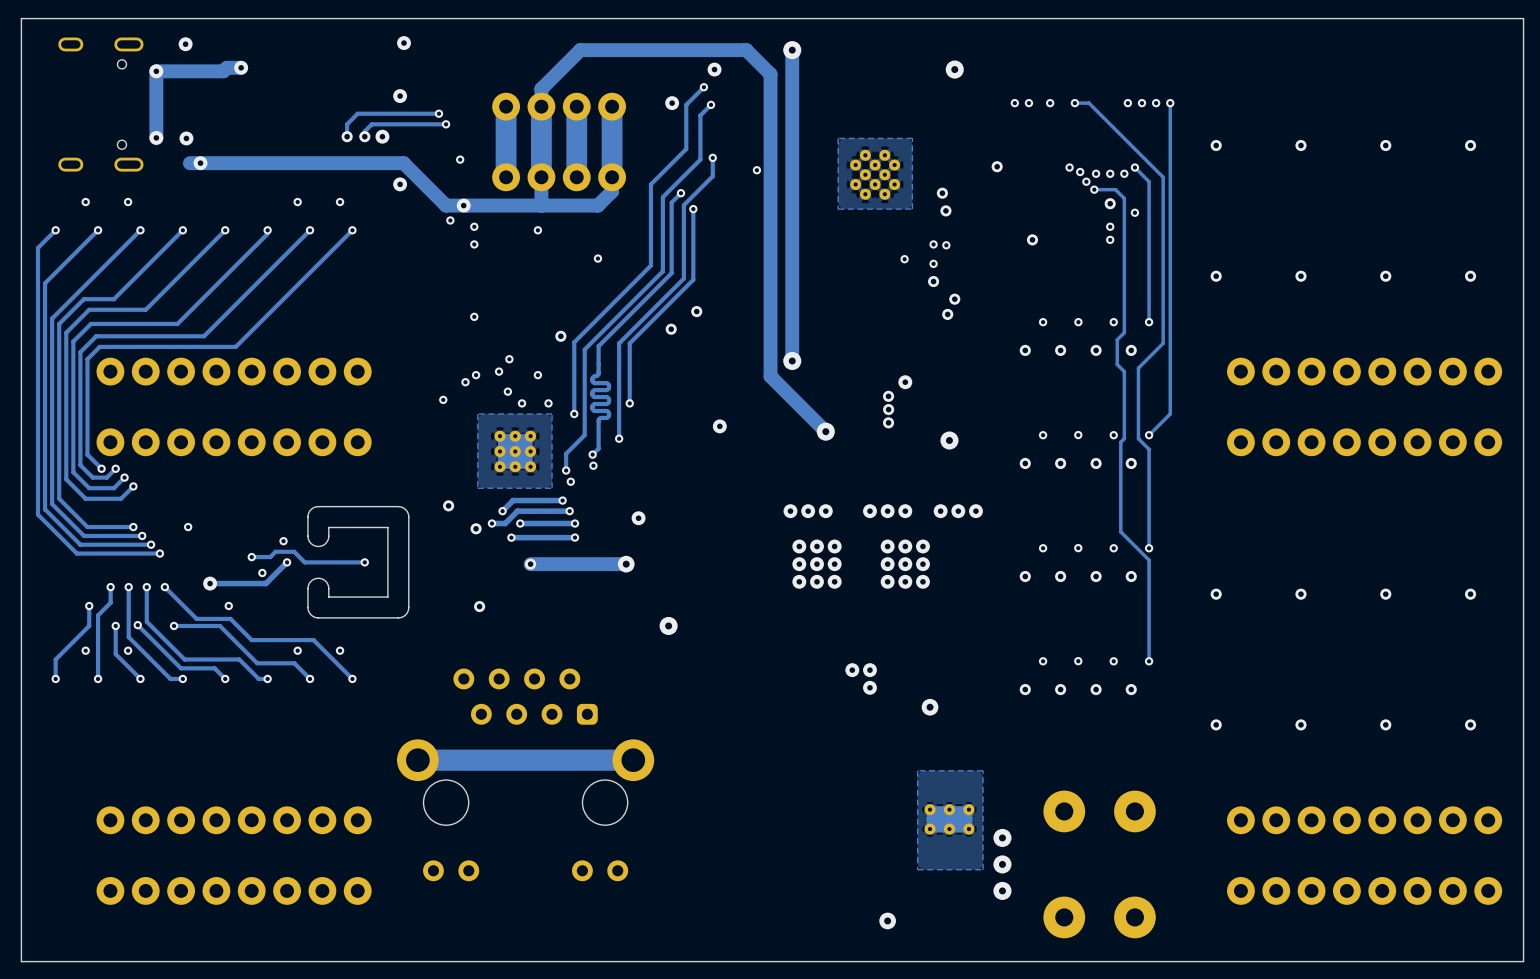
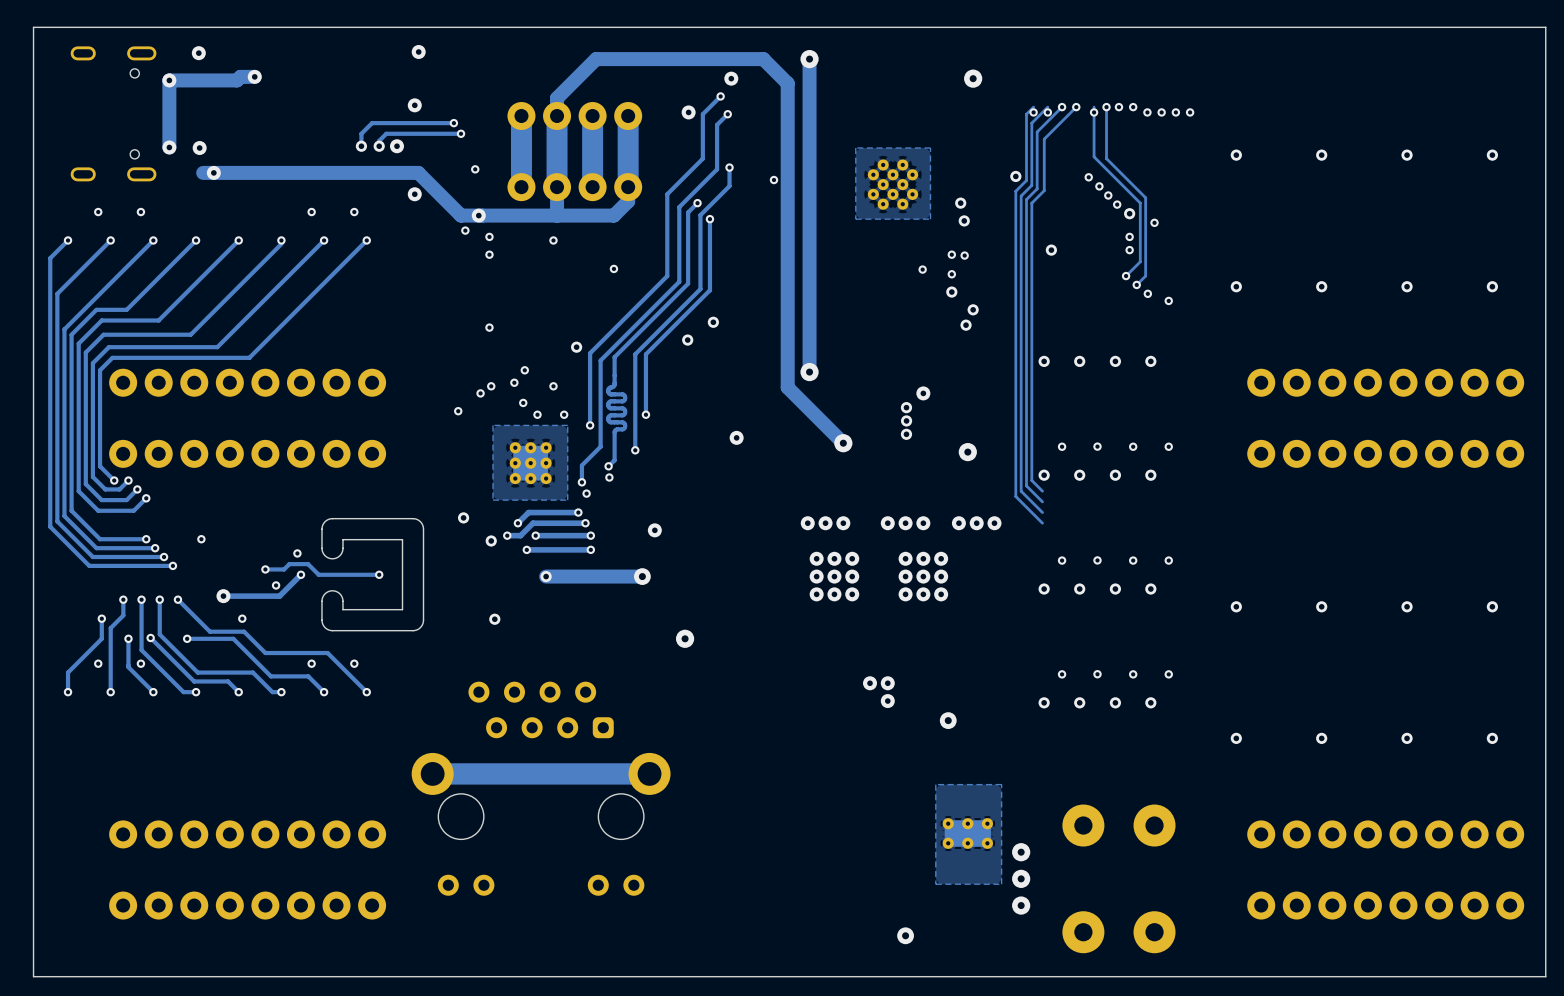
track: none -> (1033, 107) (1026, 114) (1026, 180) (1015, 191) (1015, 496) (1042, 523)
track: none -> (1047, 107) (1031, 123) (1031, 185) (1021, 196) (1021, 491) (1042, 512)
track: none -> (1062, 107) (1037, 132) (1037, 188) (1026, 199) (1026, 485) (1042, 501)
via: none -> (1062, 107)
track: none -> (1076, 107) (1044, 139) (1044, 190) (1031, 203) (1031, 480) (1042, 491)
via: none -> (1076, 107)
track: none -> (1094, 107) (1094, 156) (1140, 203) (1140, 261) (1126, 276)
track: none -> (1106, 107) (1106, 158) (1145, 197) (1145, 276) (1136, 284)
via: none -> (1106, 107)
via: none -> (1118, 107)
via: none -> (1133, 107)
via: (1050, 103) -> none
track: (1074, 103) (1089, 103) (1163, 177) (1163, 343) (1138, 368) (1138, 438) (1149, 449) (1149, 548) -> none
track: (1170, 103) (1170, 414) (1149, 435) -> none
track: (1134, 167) (1149, 181) (1149, 322) -> none
via: (1134, 167) -> none
via: (1080, 172) -> none
via: (1096, 173) -> none
via: (1110, 173) -> none
via: (1124, 173) -> none
via: none -> (1099, 186)
via: (1086, 181) -> none
via: none -> (1108, 195)
track: (1094, 189) (1115, 189) (1124, 198) (1124, 332) (1117, 339) (1117, 364) (1124, 371) (1124, 438) (1120, 442) (1120, 531) (1149, 560) (1149, 661) -> none
via: (1094, 189) -> none
via: none -> (1117, 204)
via: none -> (1126, 276)
via: none -> (1136, 284)
via: none -> (1147, 293)
via: none -> (1168, 300)
via: (1043, 322) -> none
via: (1078, 322) -> none
via: (1113, 322) -> none
via: (1149, 322) -> none

